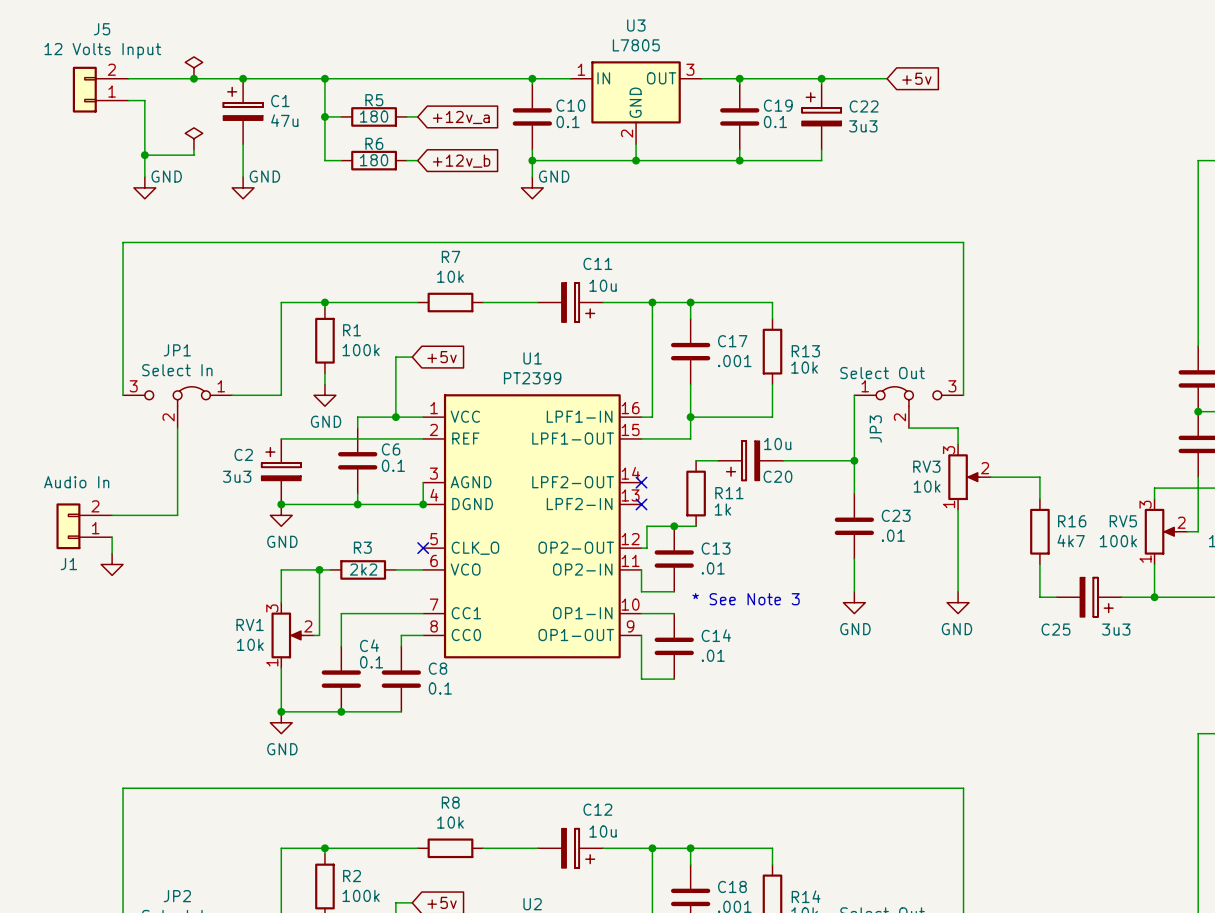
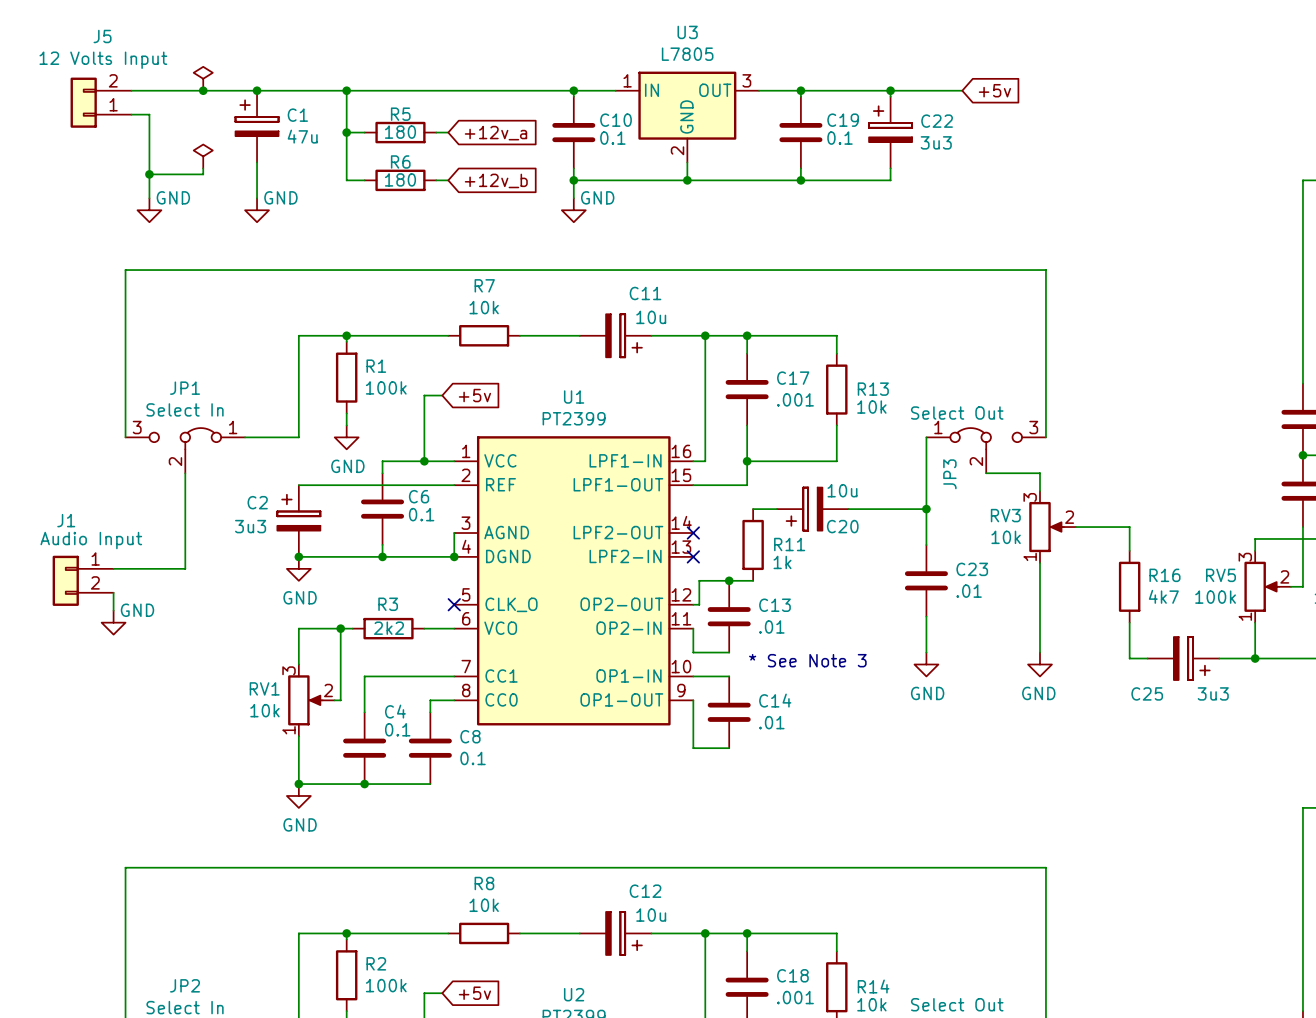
J1 value: Audio In (76, 482) -> Audio Input (91, 540)
J1 flip: as is (68, 526) -> up-down (65, 580)
power symbol text: none -> GND (137, 610)

